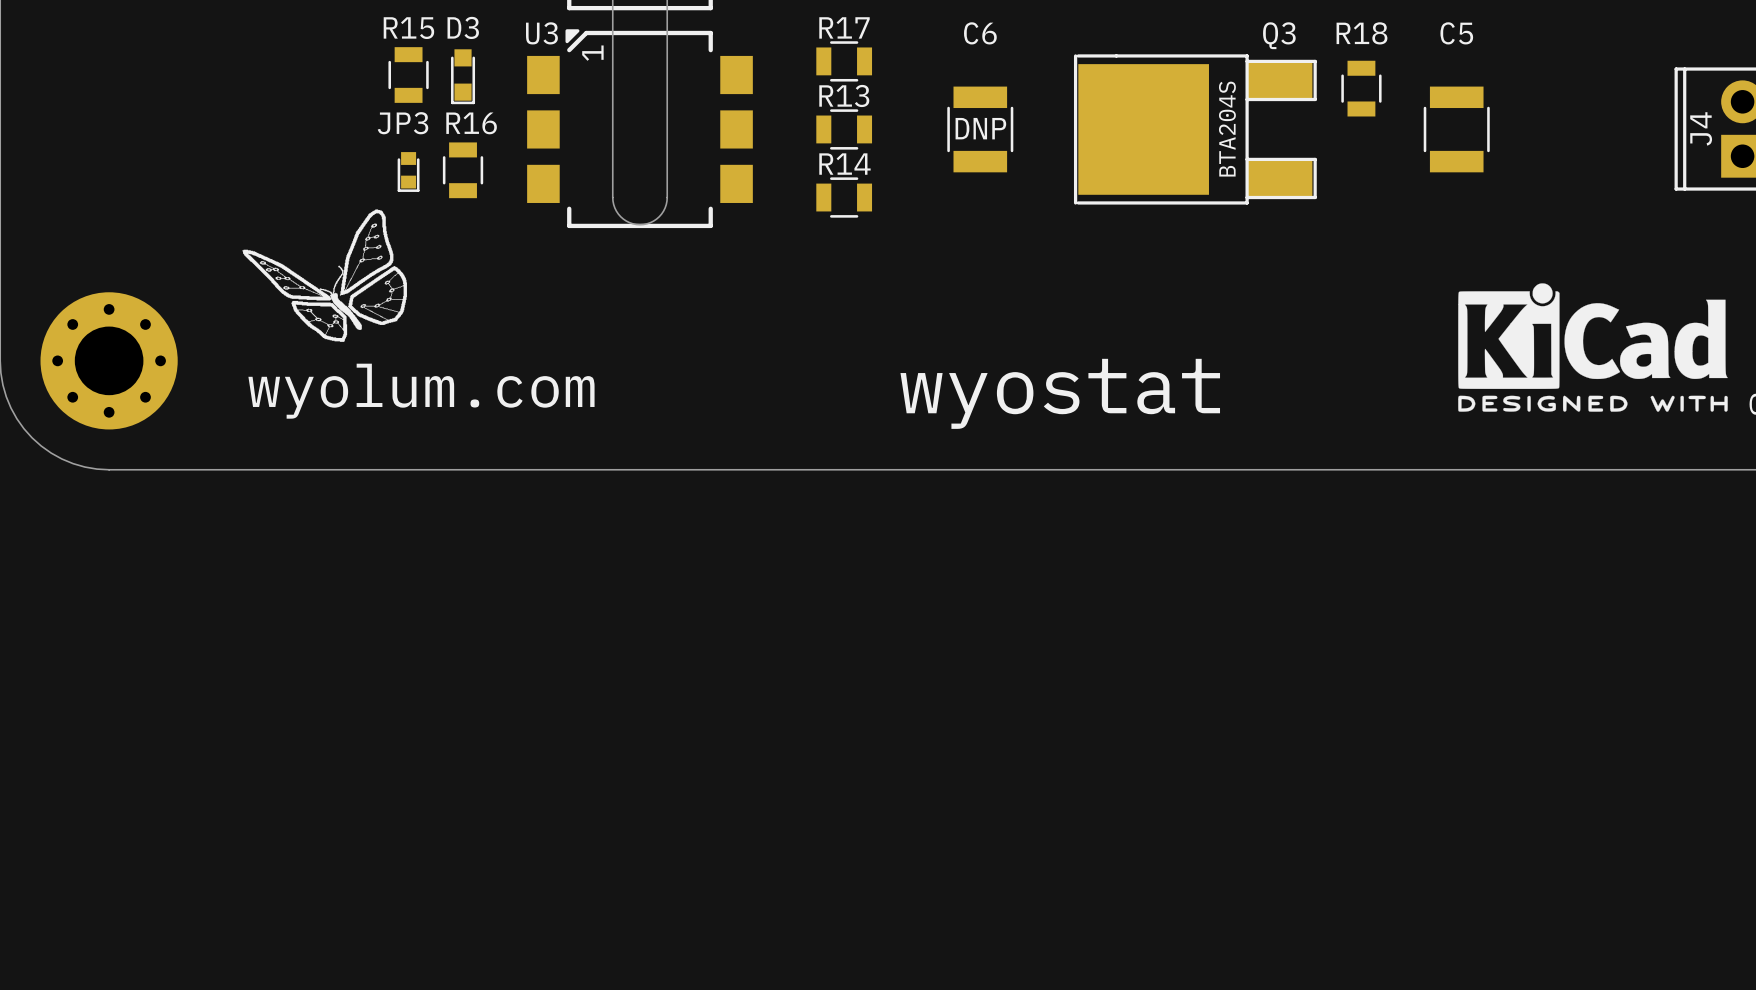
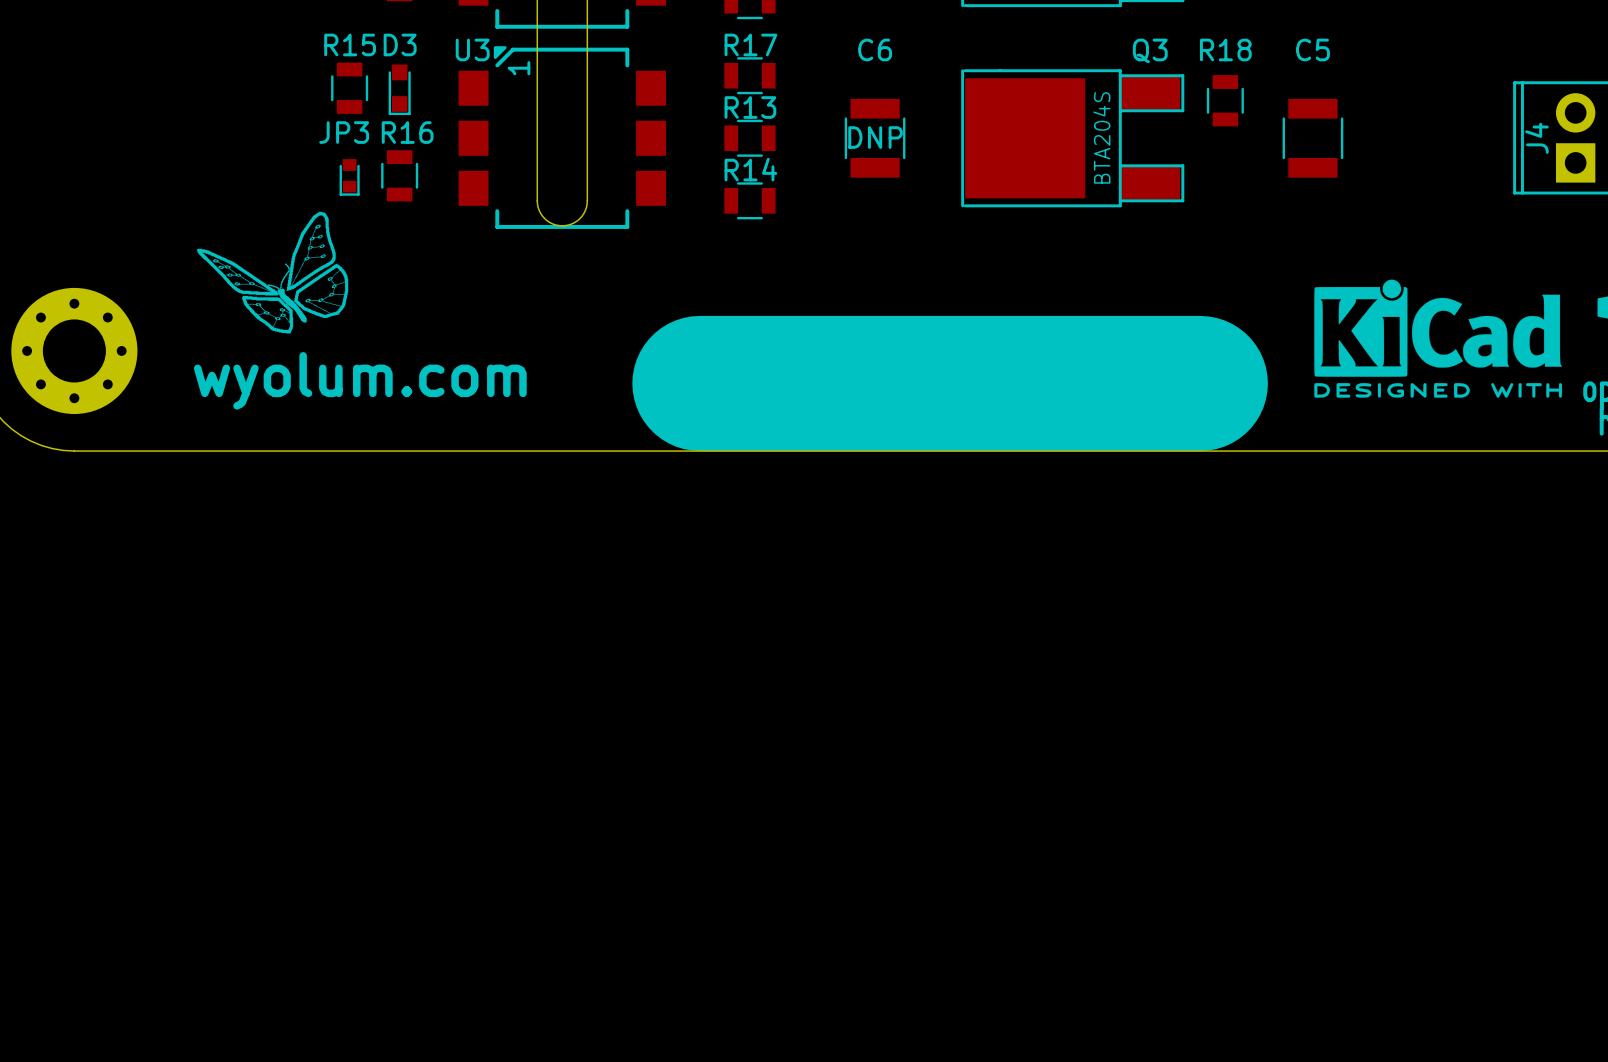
text: wyostat (1060, 393) -> none
line: none -> (699, 383) (1200, 383)

